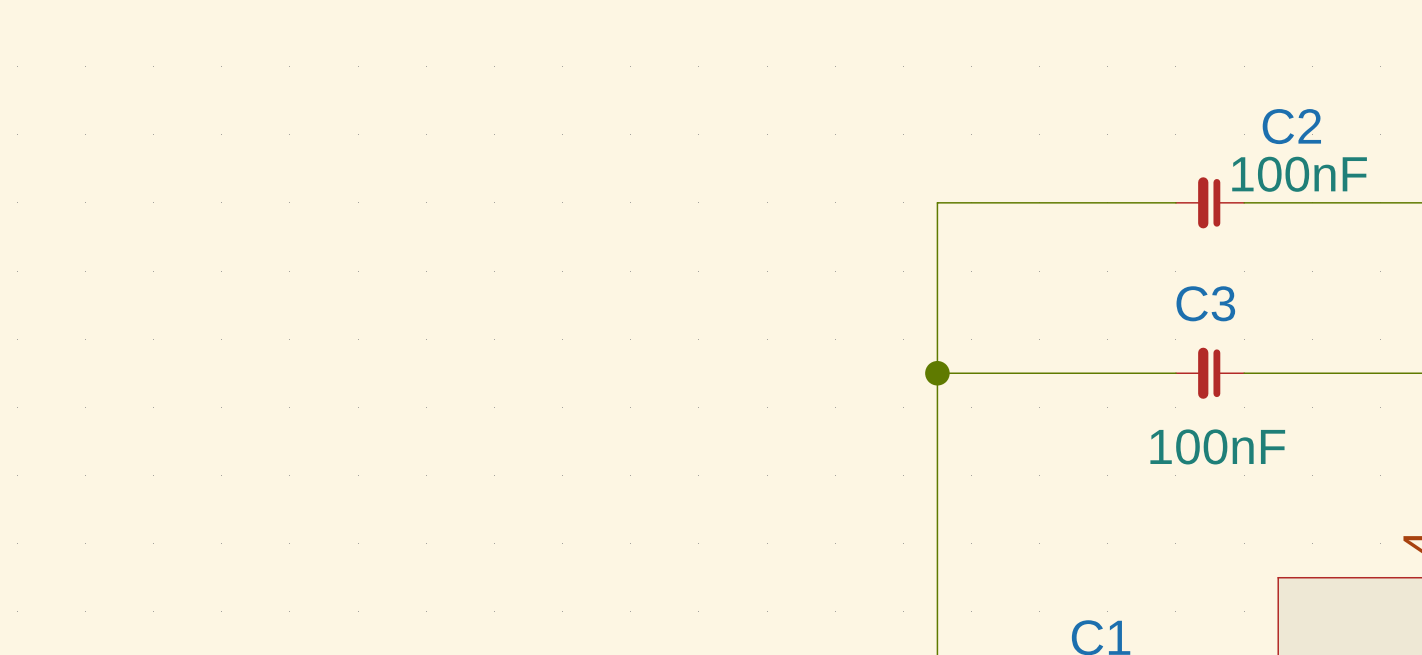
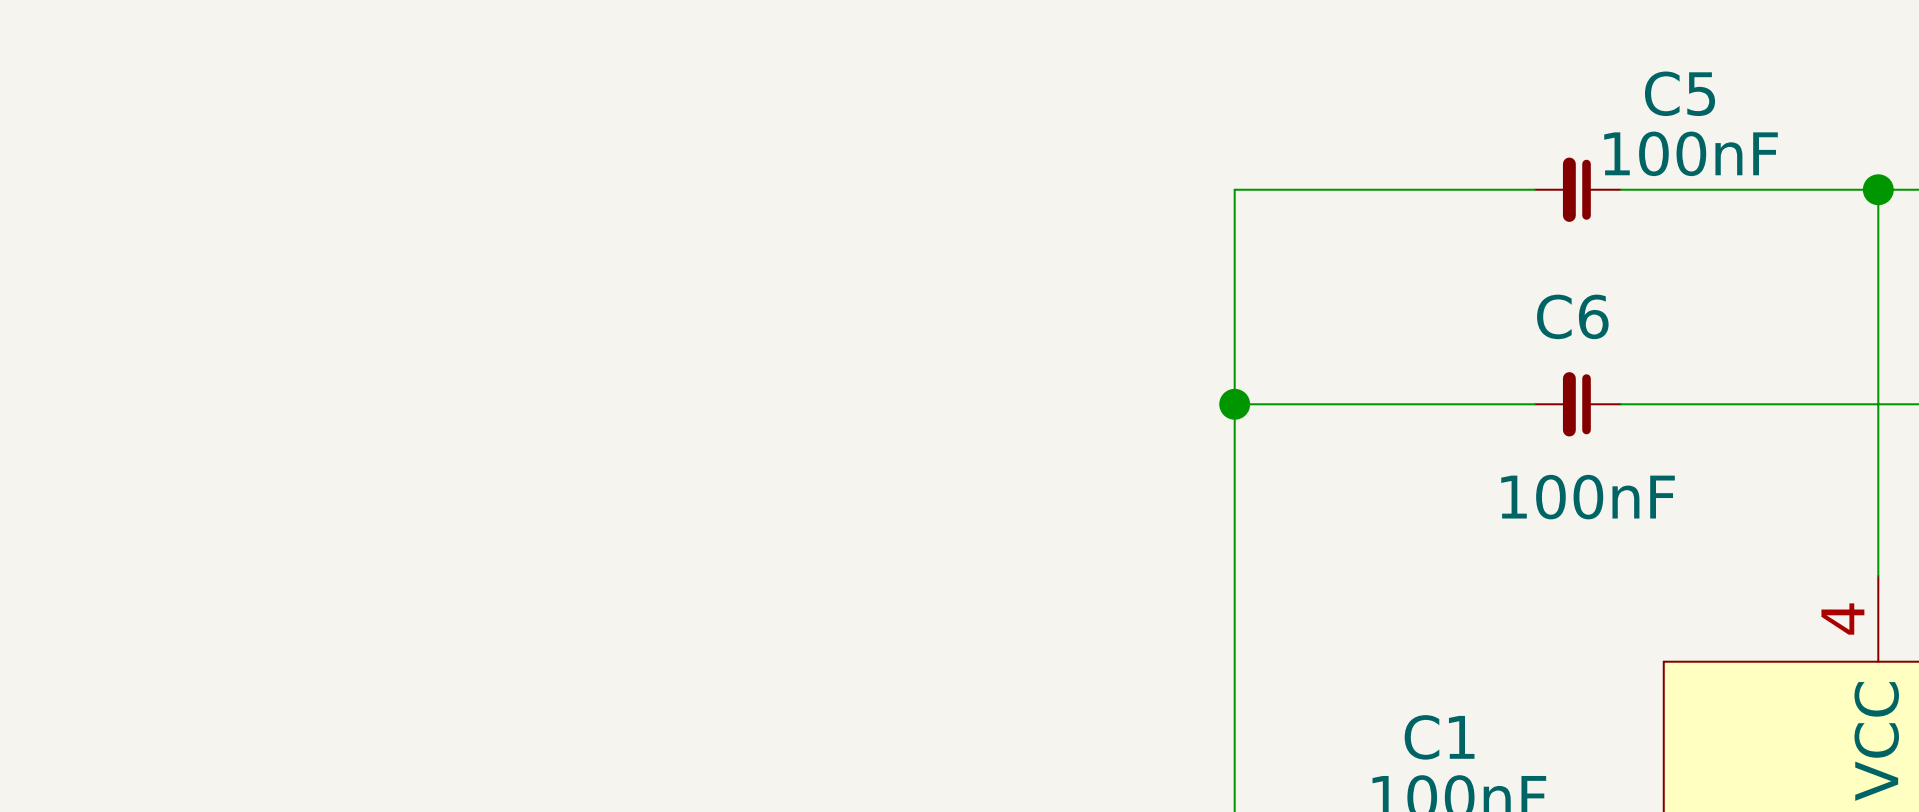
C2 name: C2 (1291, 126) -> C5 (1680, 93)
C3 name: C3 (1205, 303) -> C6 (1572, 316)

